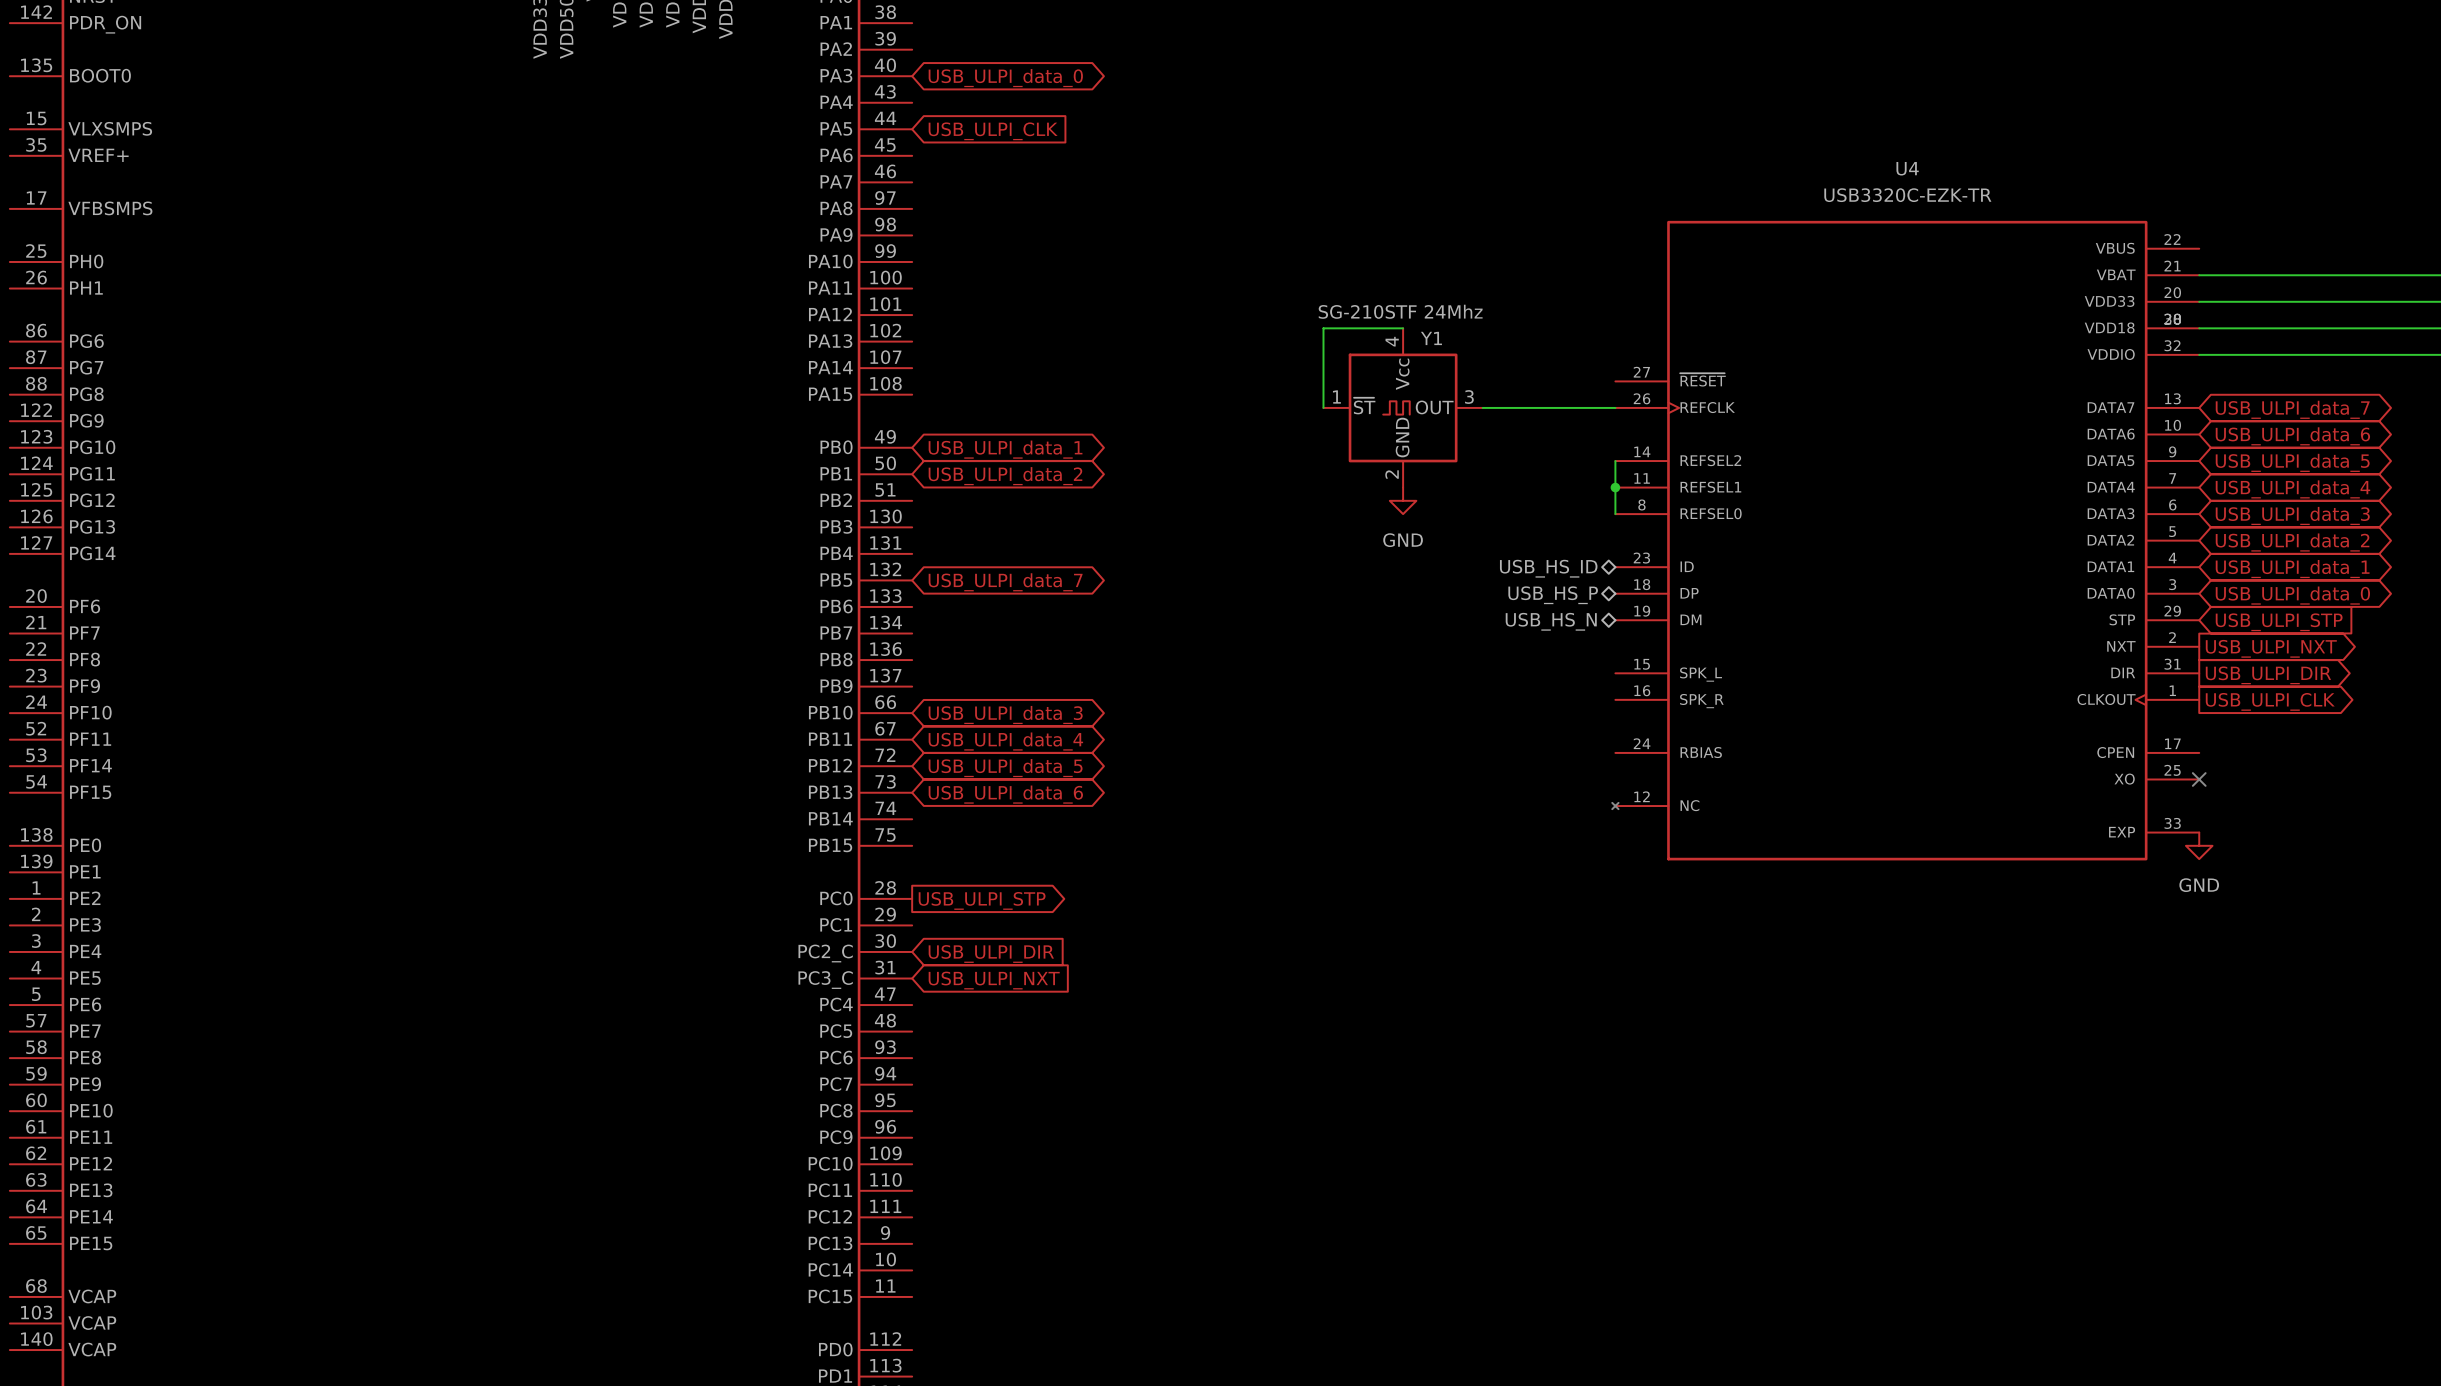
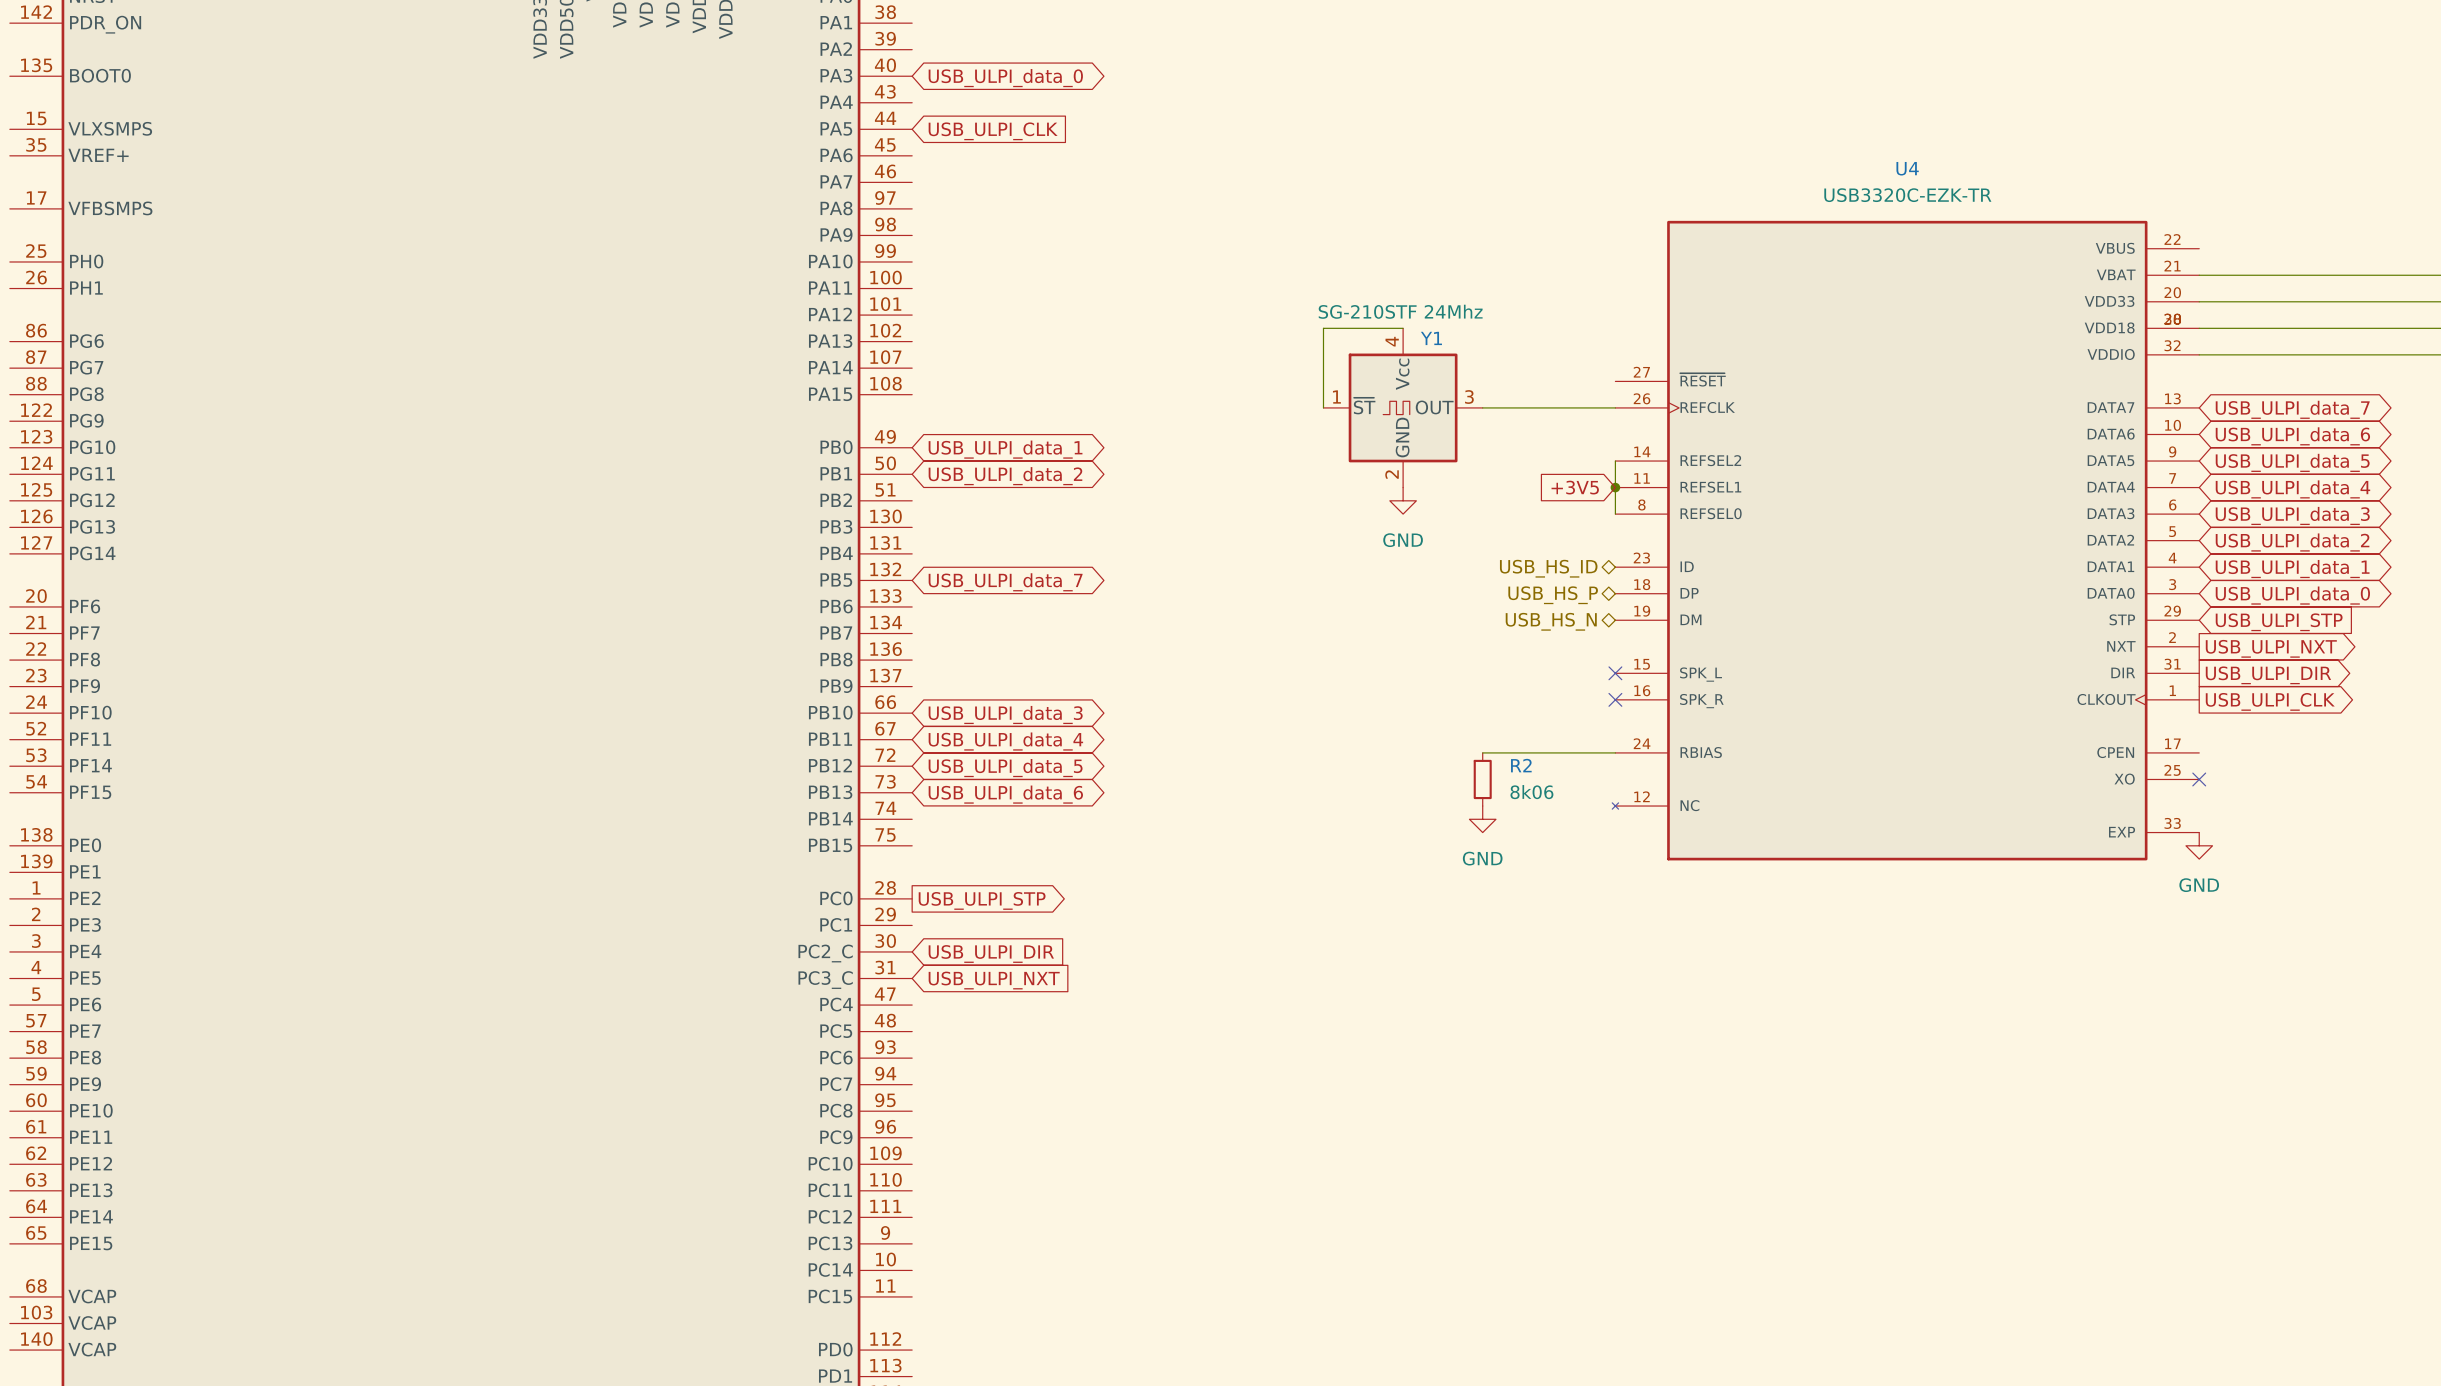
global label: none -> +3V5 (1575, 487)
no-connect mark: none -> (1615, 673)
no-connect mark: none -> (1615, 699)
wire: none -> (1482, 752) (1615, 752)
R2: none -> 8k06 (1482, 779)
power symbol: none -> GND (1482, 819)

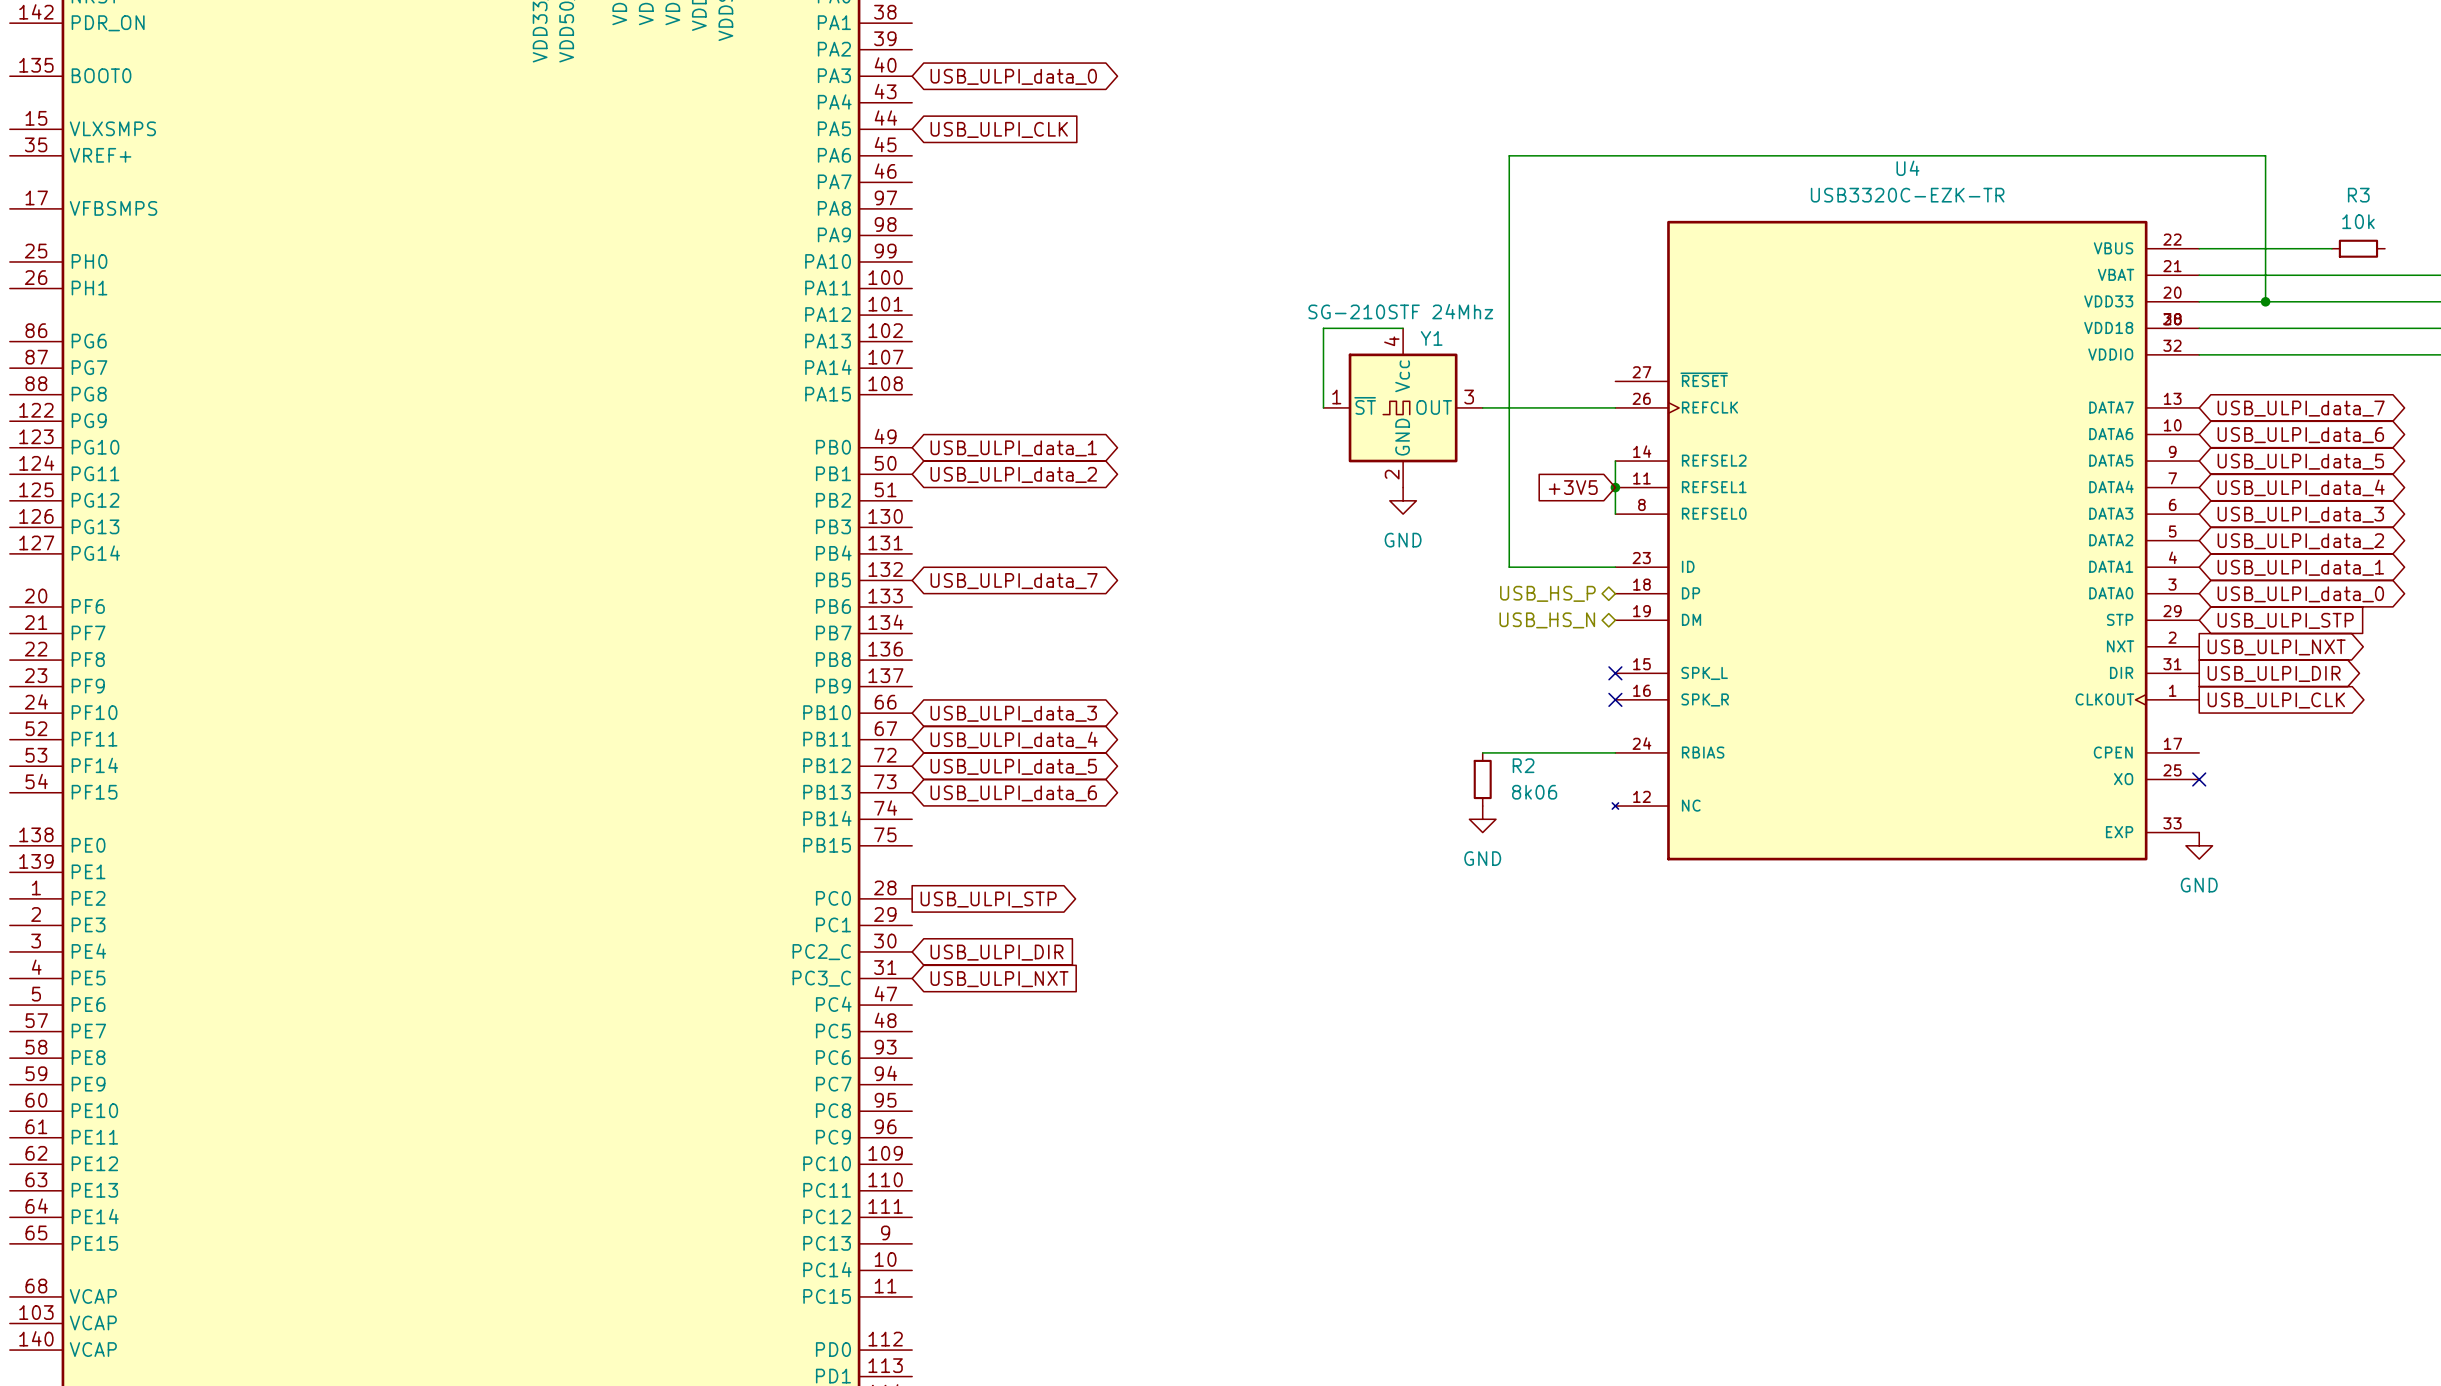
wire: none -> (2199, 248) (2331, 248)
R3: none -> 10k (2358, 248)
wire: none -> (2265, 301) (2265, 155) (1509, 155) (1509, 567) (1615, 567)
junction: none -> (2265, 301)
hierarchical label: USB_HS_ID (1548, 568) -> none

